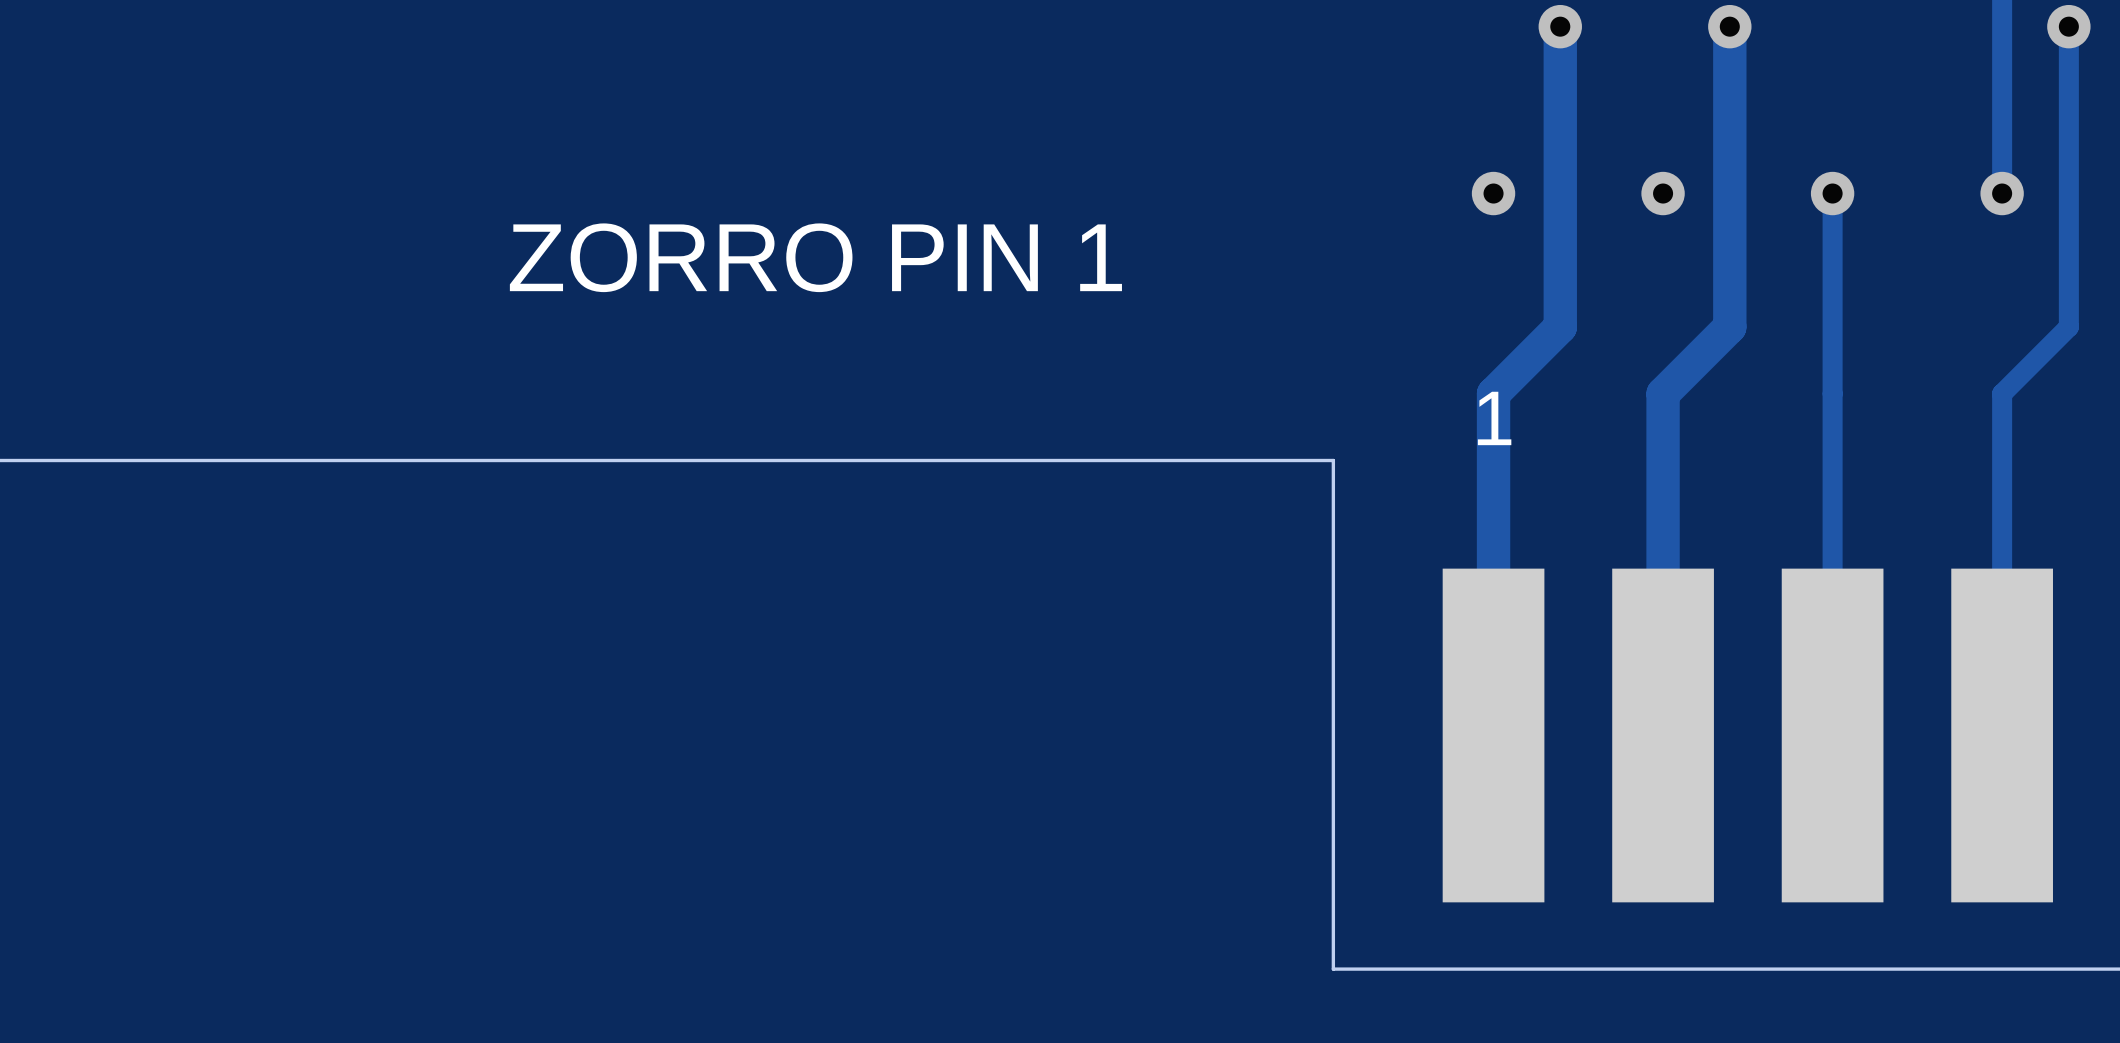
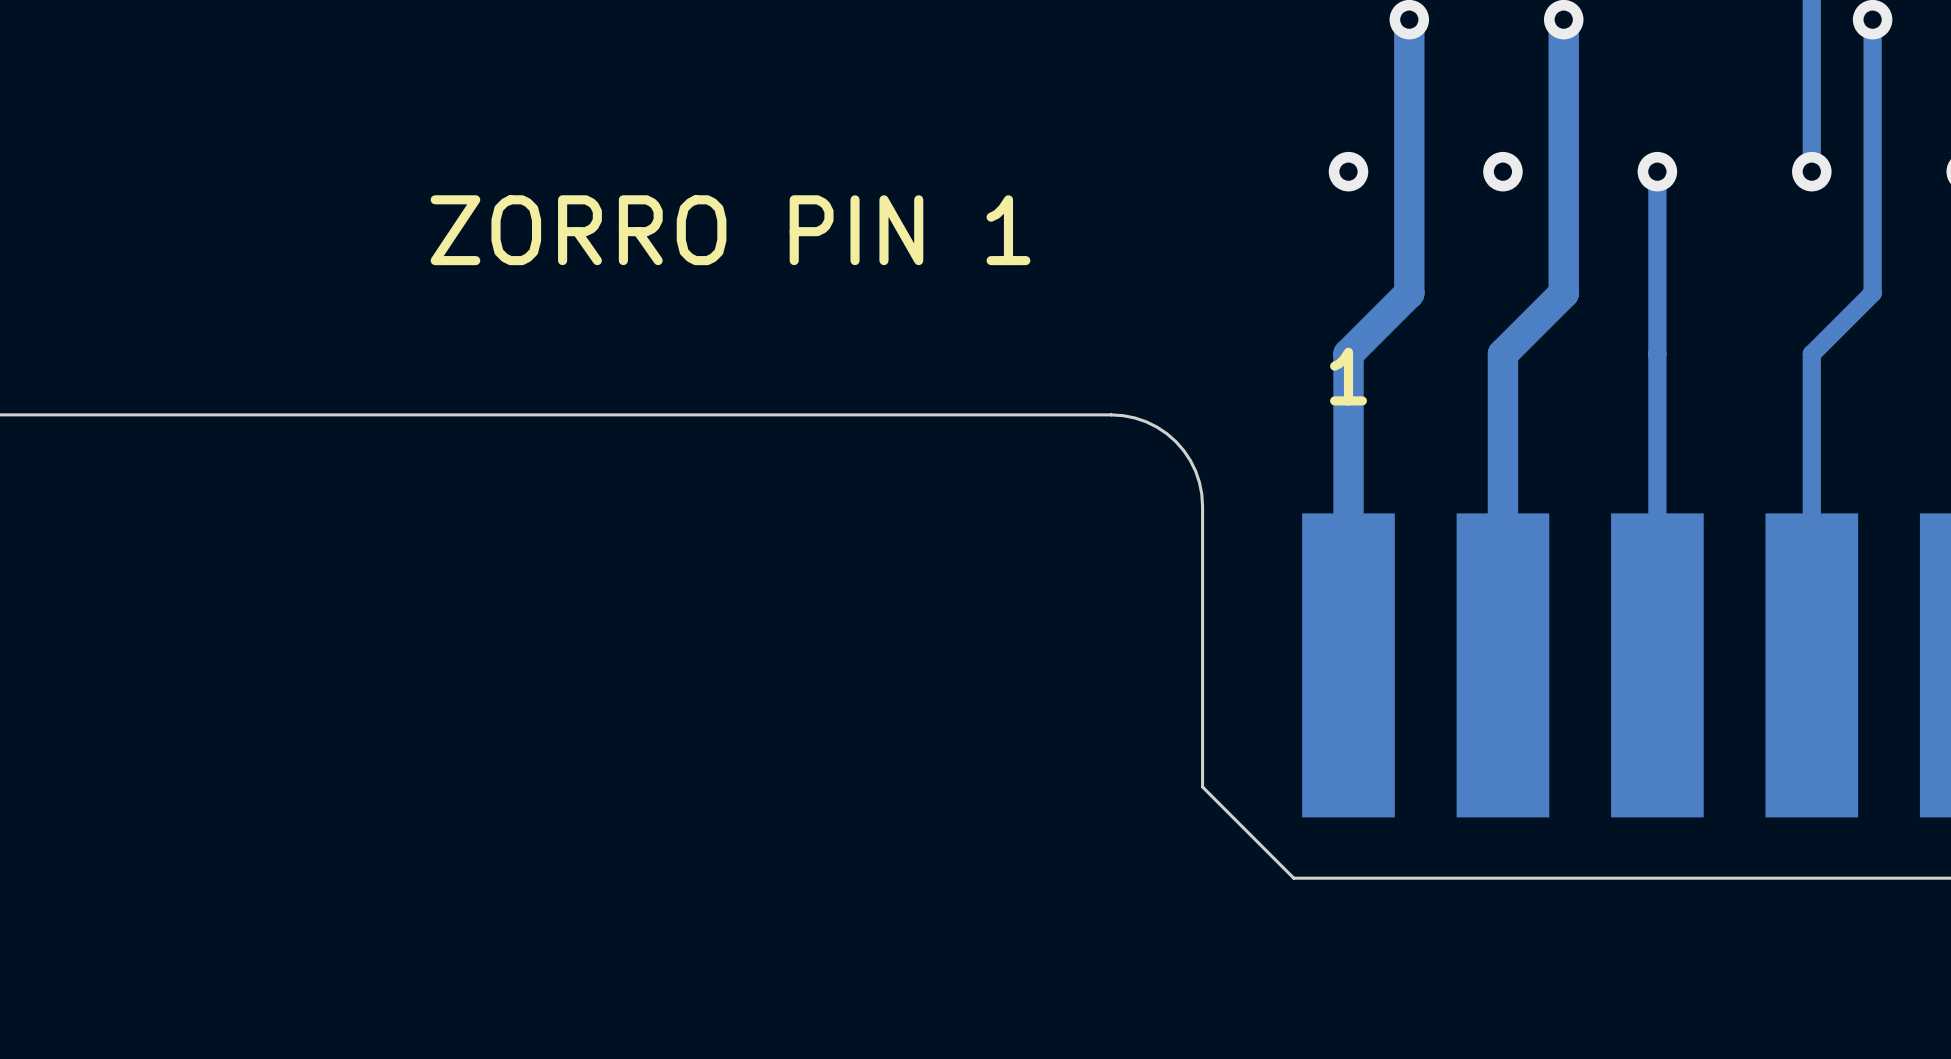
board edge: (1233, 460) (1333, 460) (1333, 560) -> (1111, 414) (1134, 417) (1146, 421) (1166, 433) (1175, 441) (1183, 450) (1195, 471) (1201, 494) (1202, 506)
board edge: (1333, 868) (1333, 969) (1433, 969) -> (1202, 786) (1293, 878)

